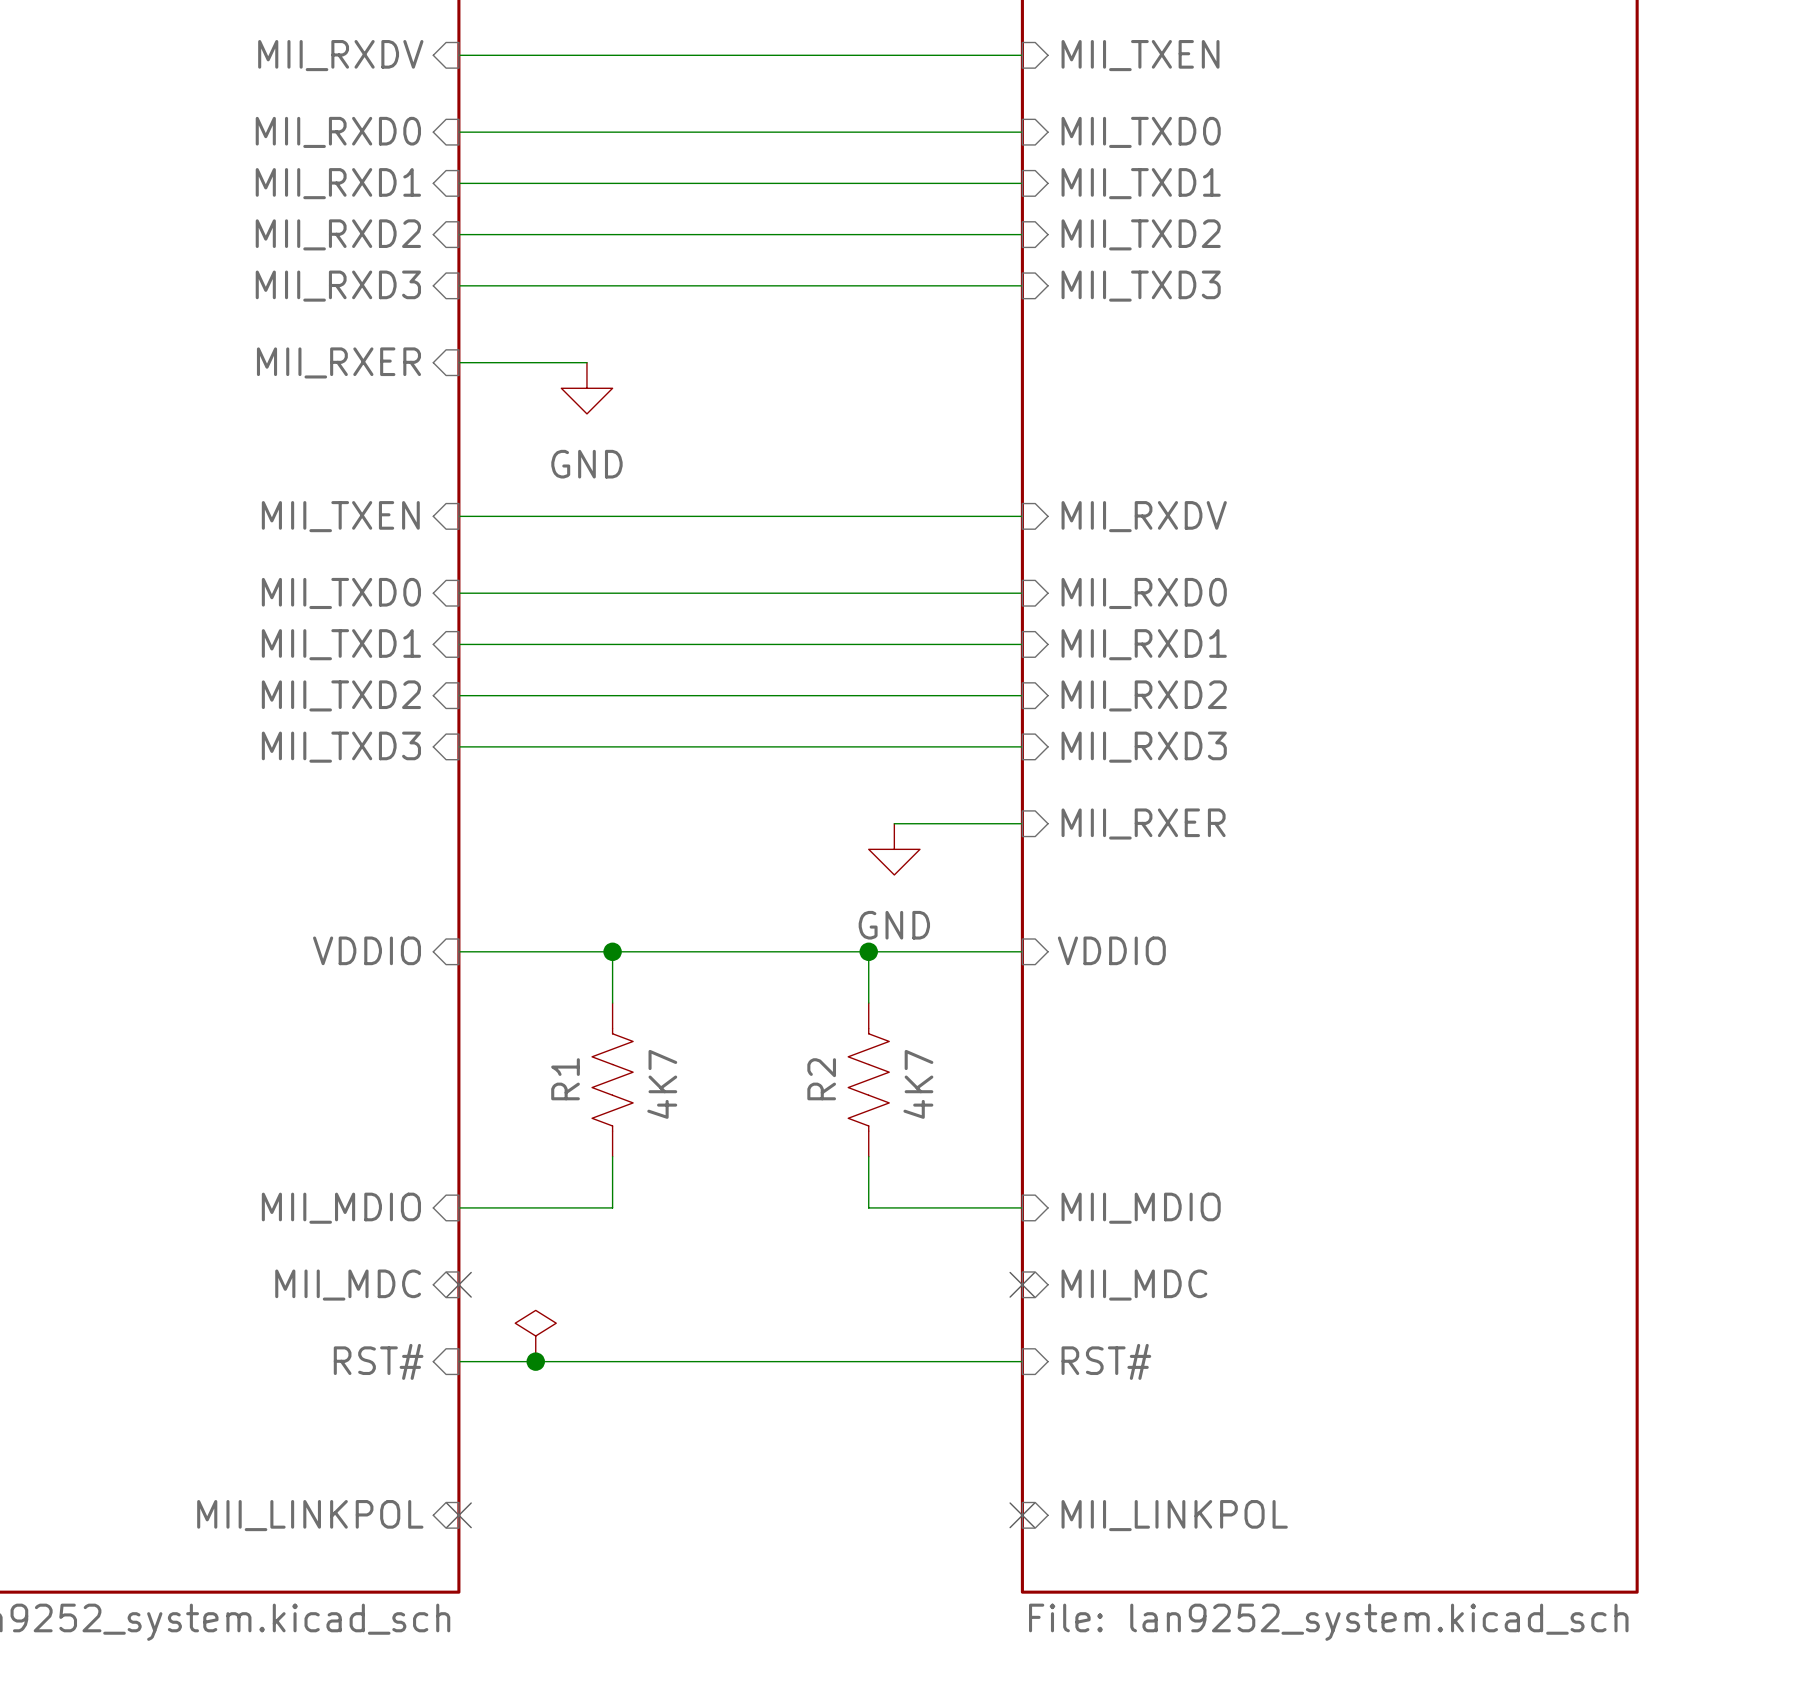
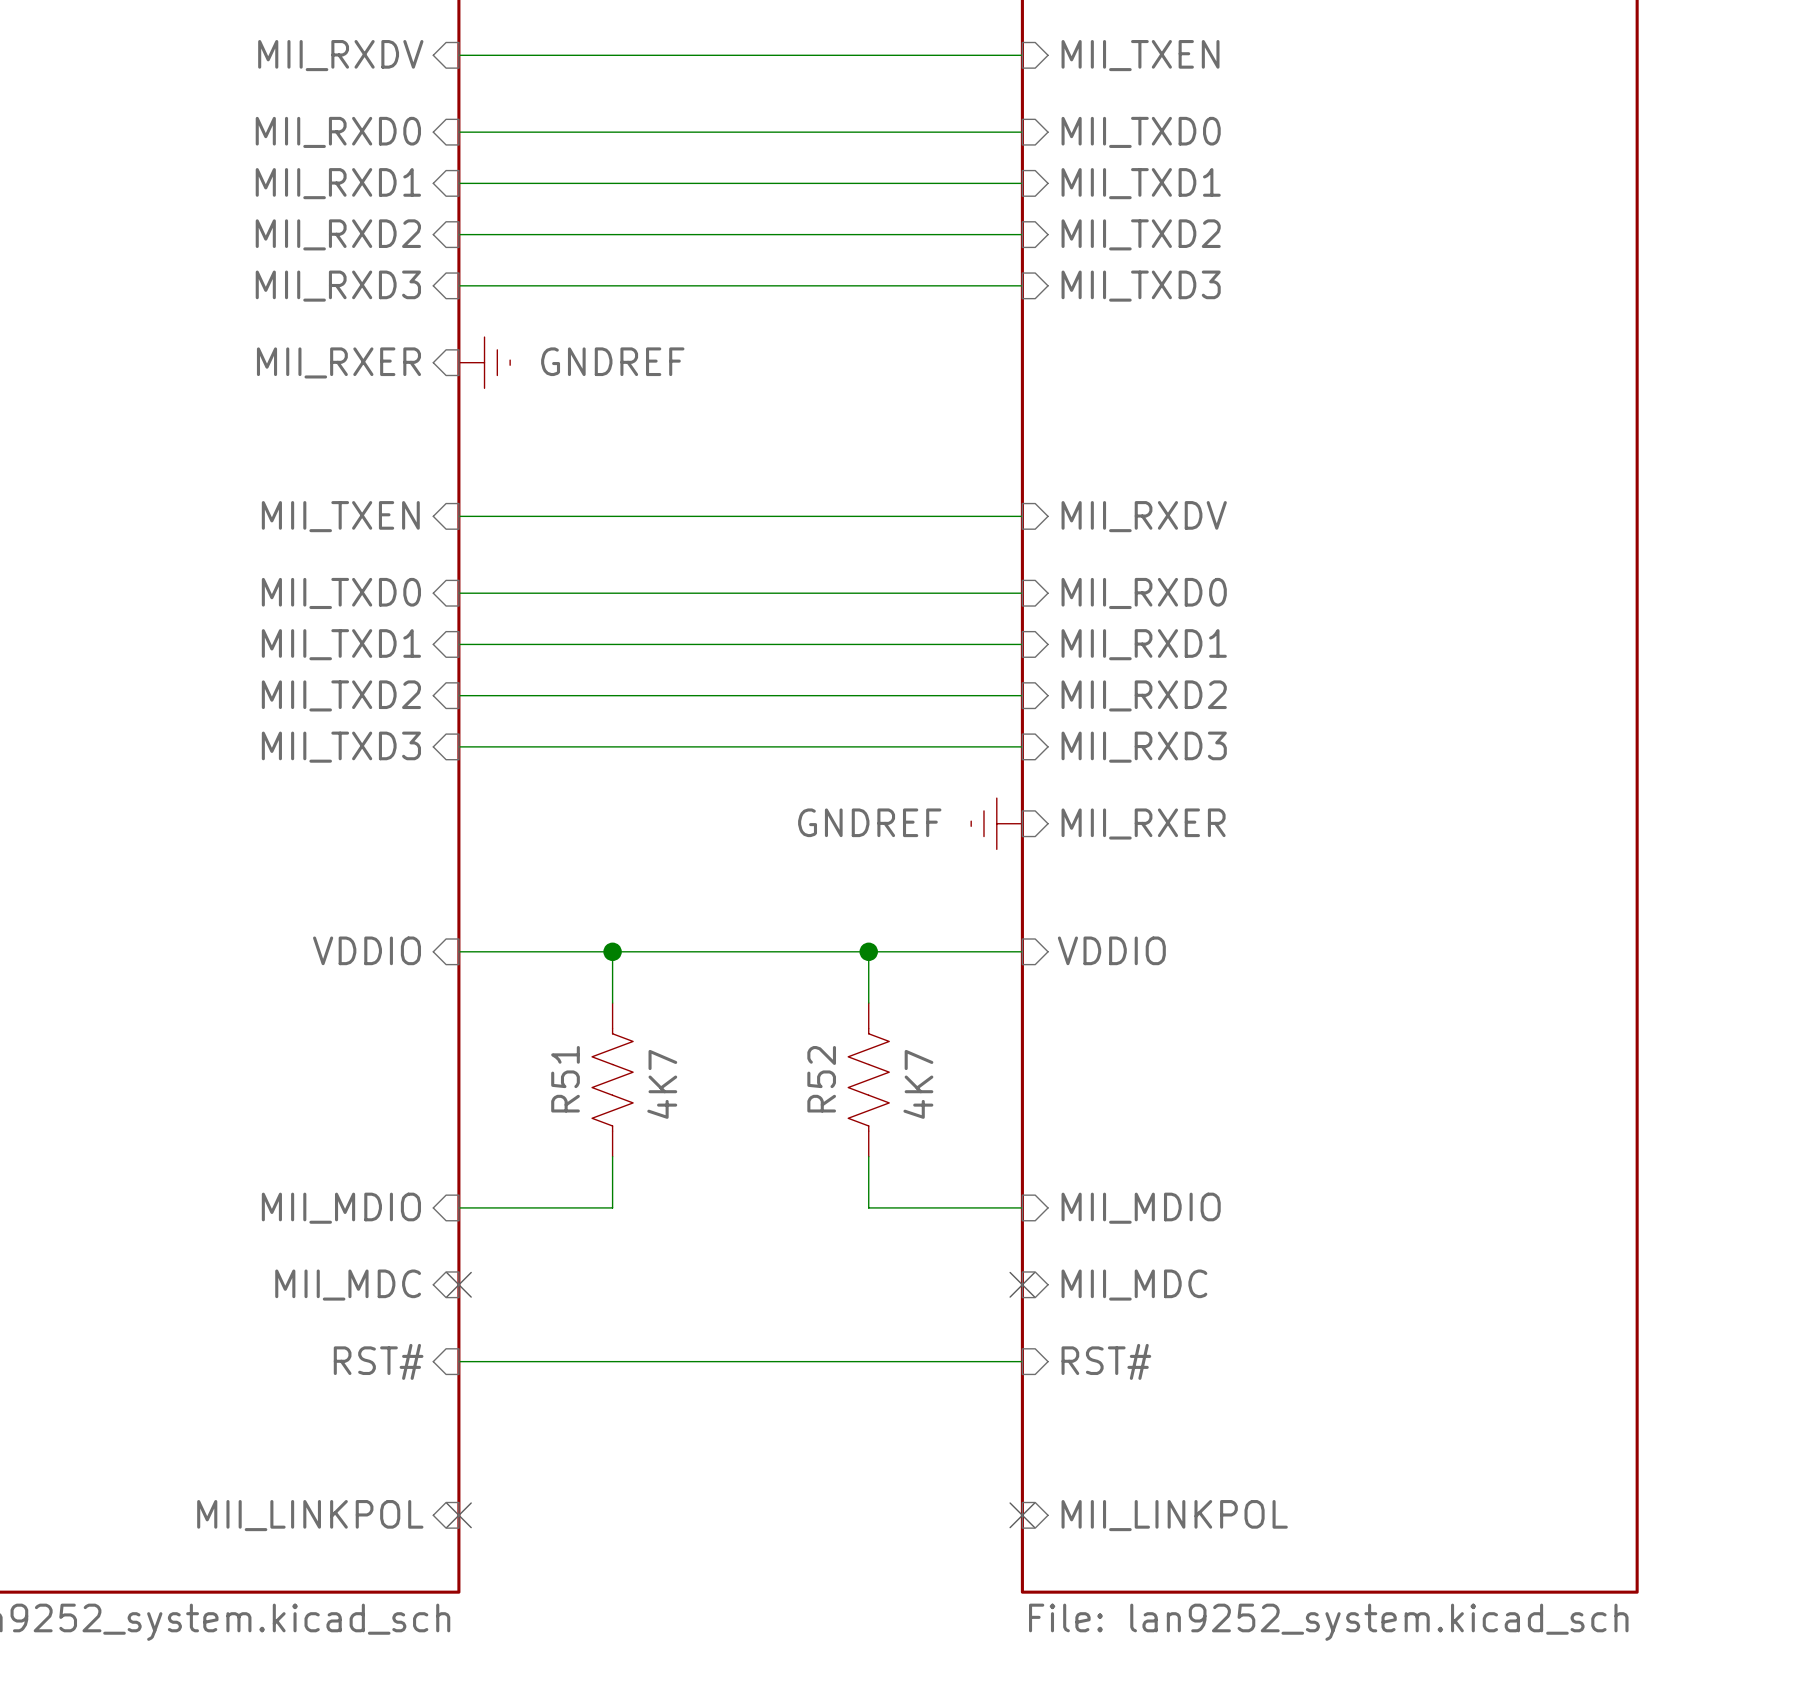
wire: (458, 362) (586, 362) -> none
power symbol: none -> GNDREF (484, 362)
power symbol: GND (586, 388) -> none
wire: (894, 823) (1022, 823) -> none
power symbol: none -> GNDREF (996, 823)
power symbol: GND (894, 849) -> none
R1 name: R1 (565, 1079) -> R51 (565, 1079)
R2 name: R2 (821, 1079) -> R52 (821, 1079)
power symbol: (535, 1336) -> none
junction: (535, 1361) -> none

